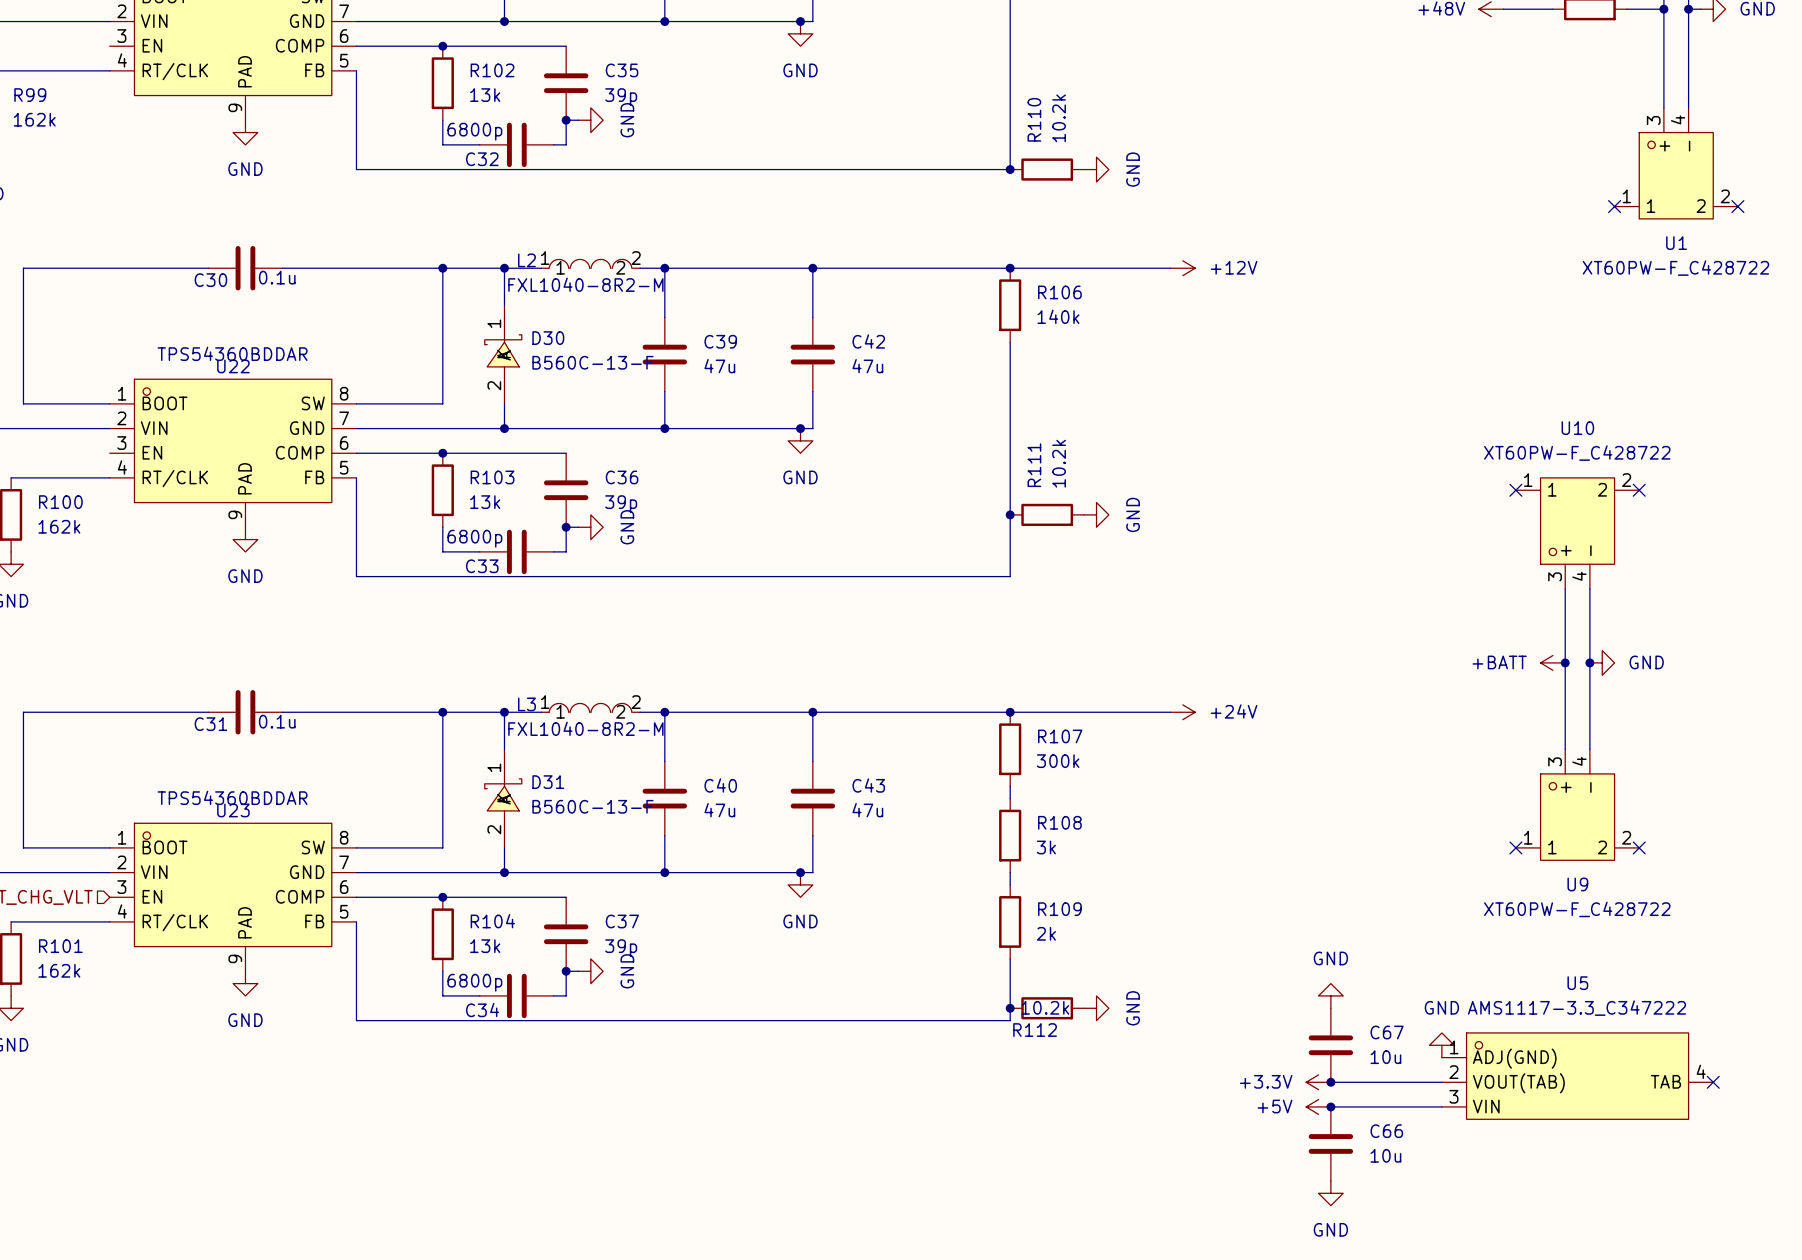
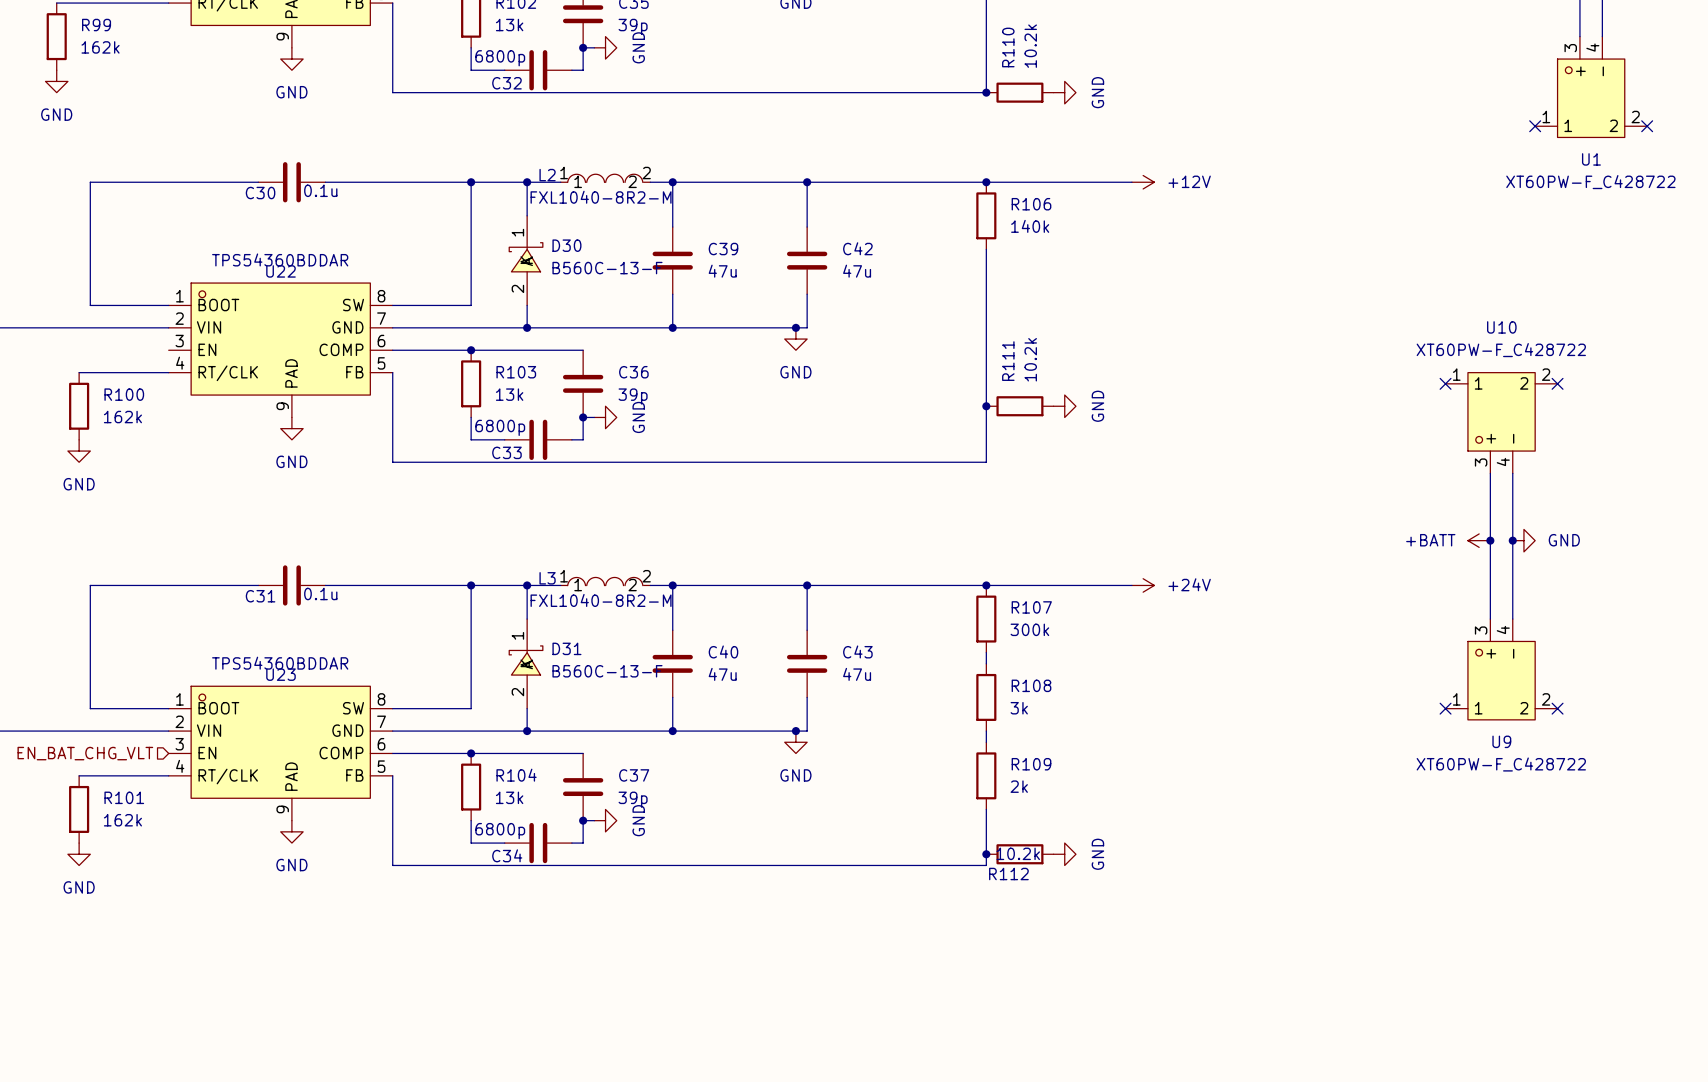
power symbol: GND (1330, 995) -> none
C67: 10u (1330, 1045) -> none
power symbol: GND (1441, 1045) -> none
U5: AMS1117-3.3_C347222 (1577, 1076) -> none
power symbol: +3.3V (1318, 1082) -> none
wire: (1330, 1082) (1441, 1082) -> none
junction: (1330, 1082) -> none
no-connect mark: (1713, 1082) -> none
power symbol: +5V (1318, 1106) -> none
wire: (1330, 1106) (1441, 1106) -> none
junction: (1330, 1106) -> none
C66: 10u (1330, 1143) -> none
power symbol: GND (1330, 1193) -> none

